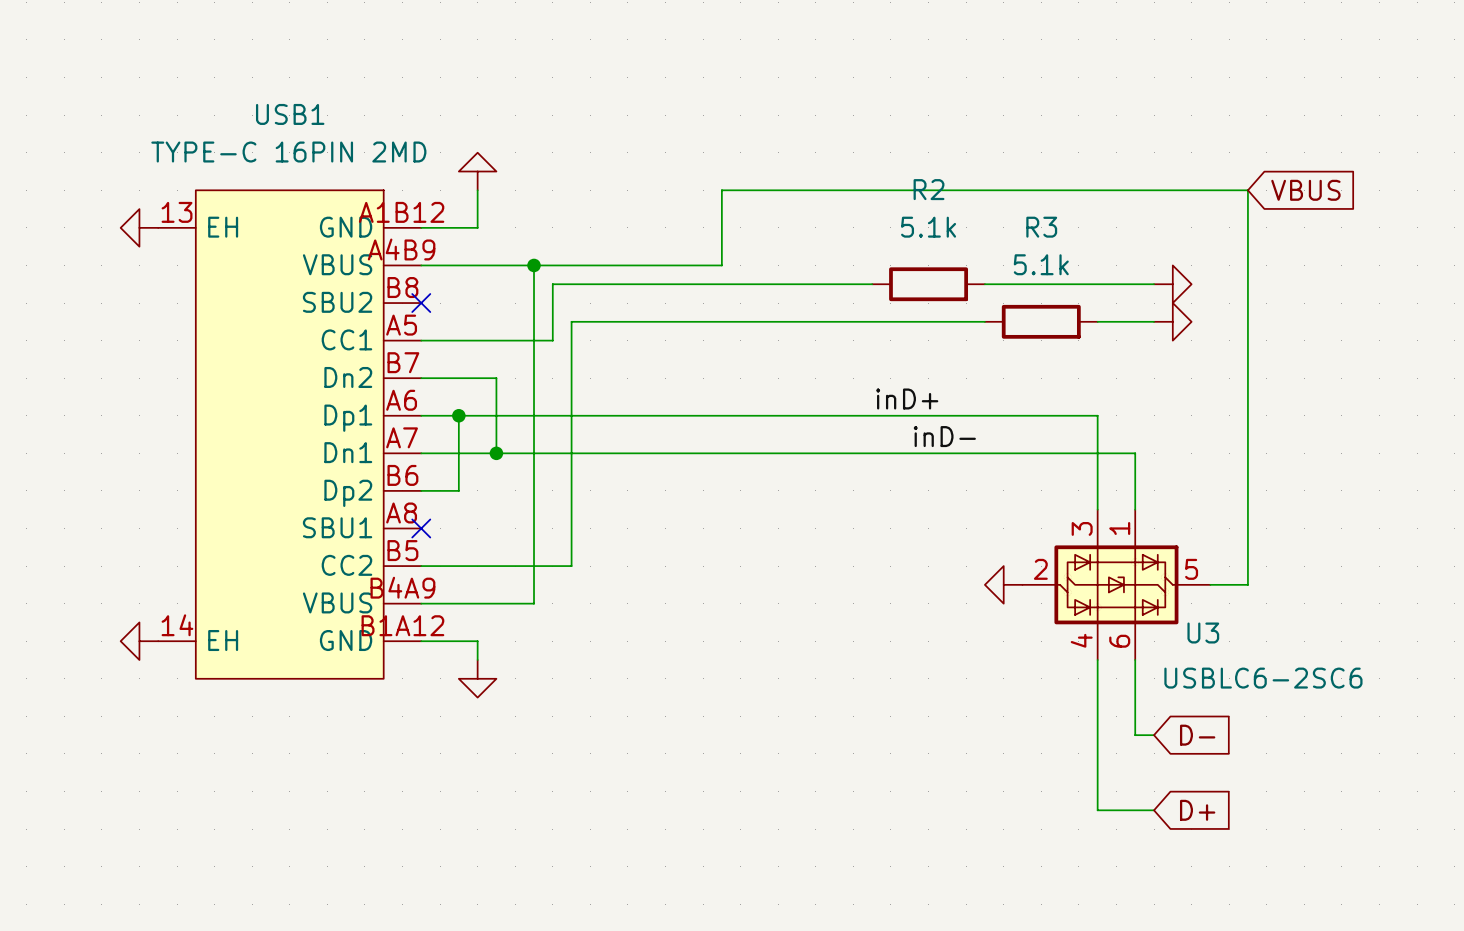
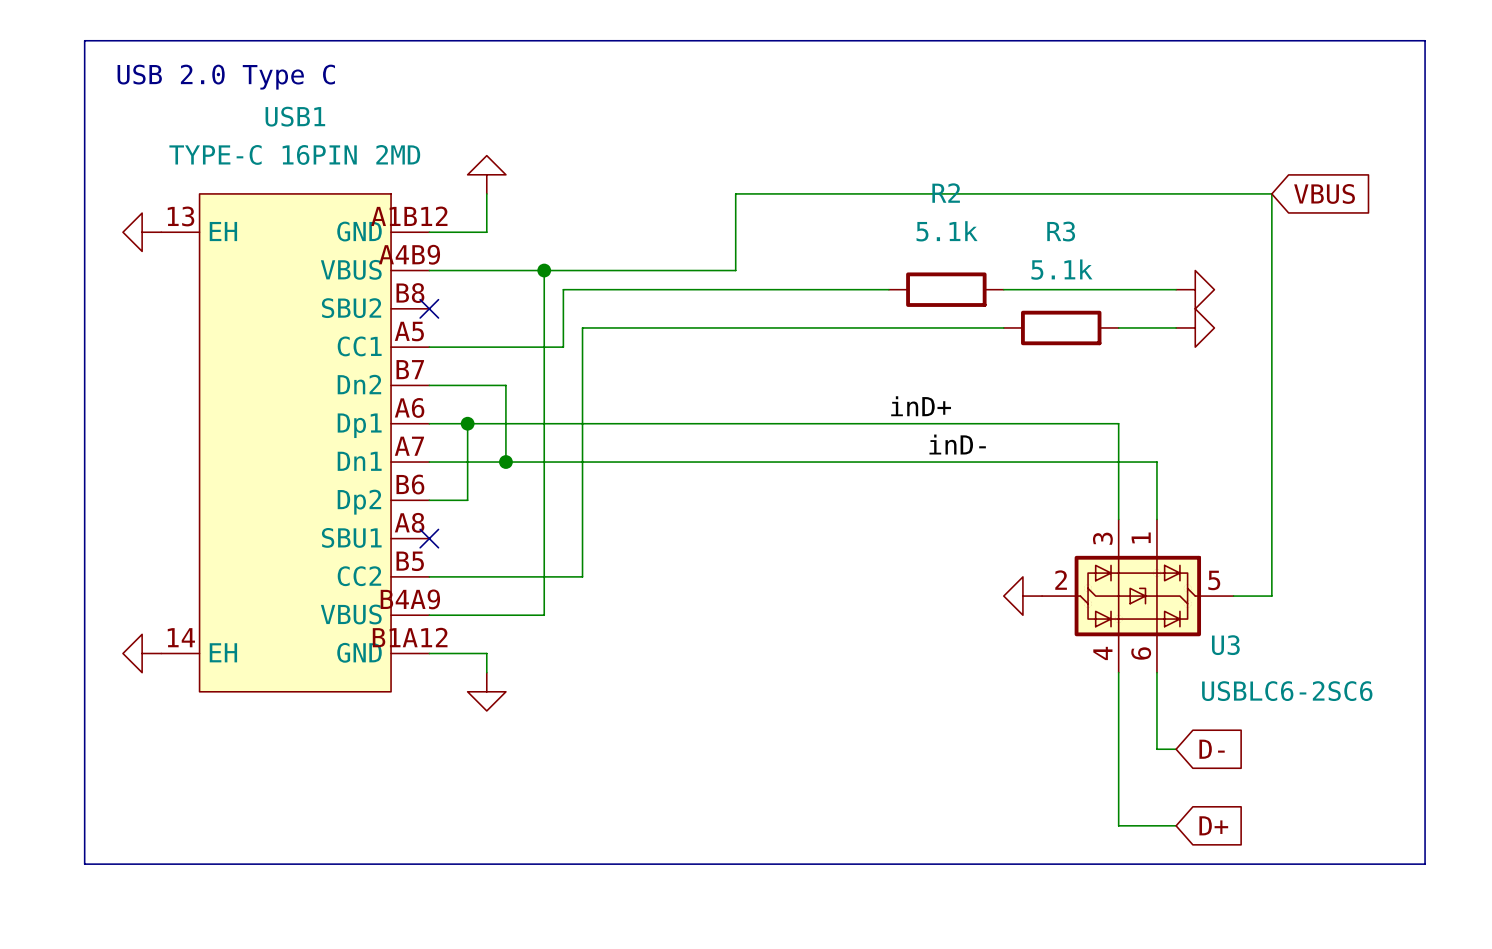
line: none -> (84, 40) (1425, 40) (1425, 864) (84, 864) (84, 40)
text: none -> USB 2.0 Type C (226, 77)

